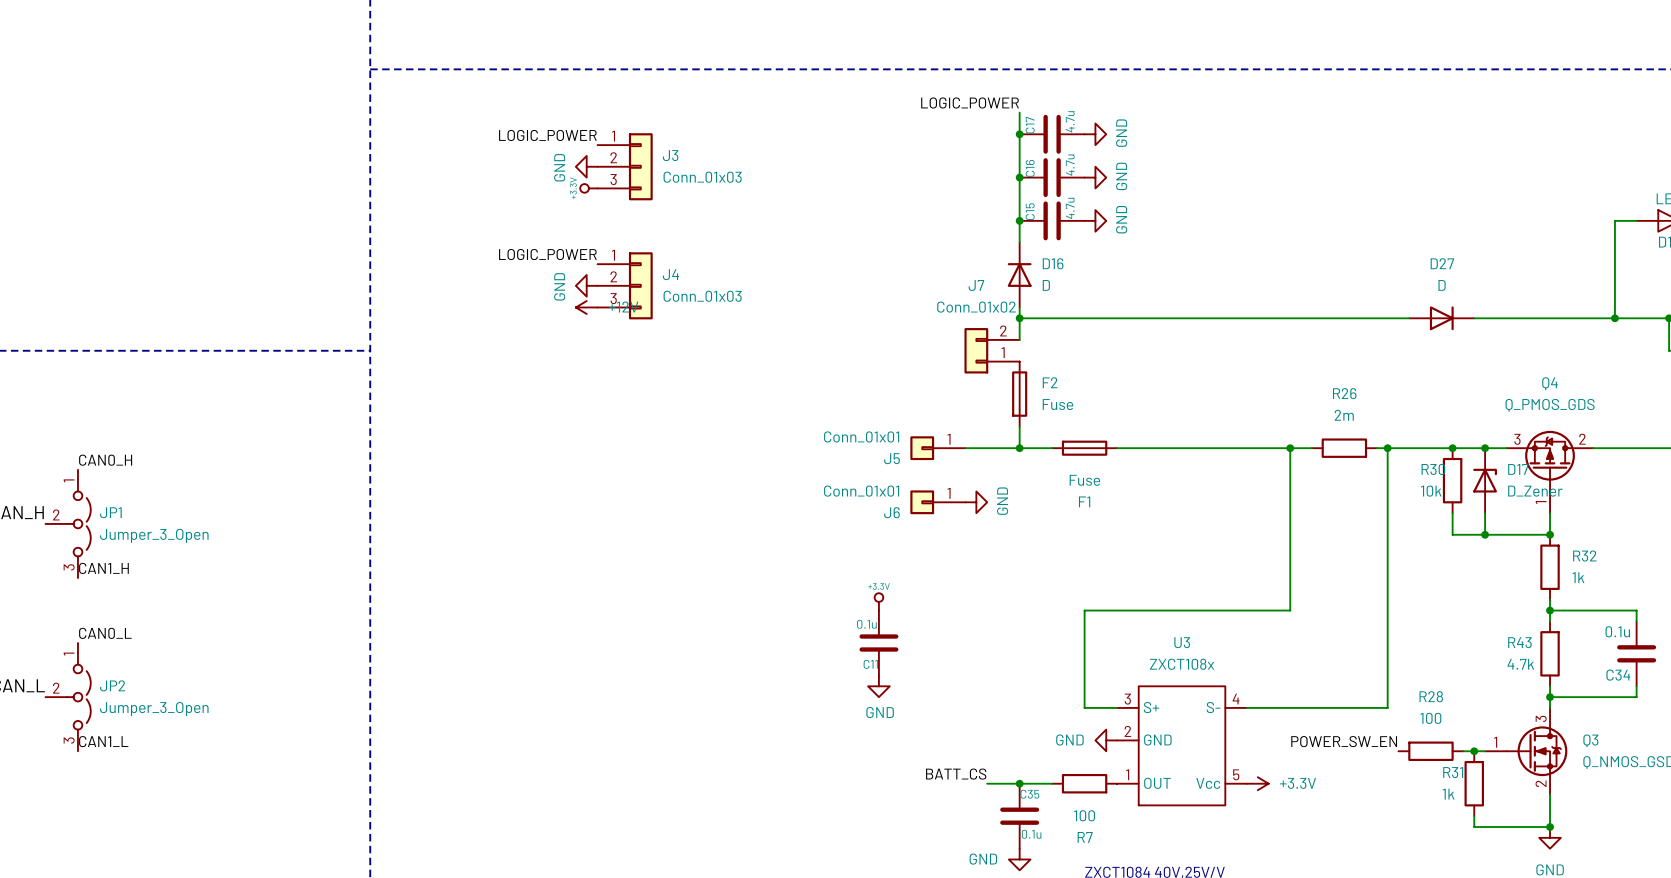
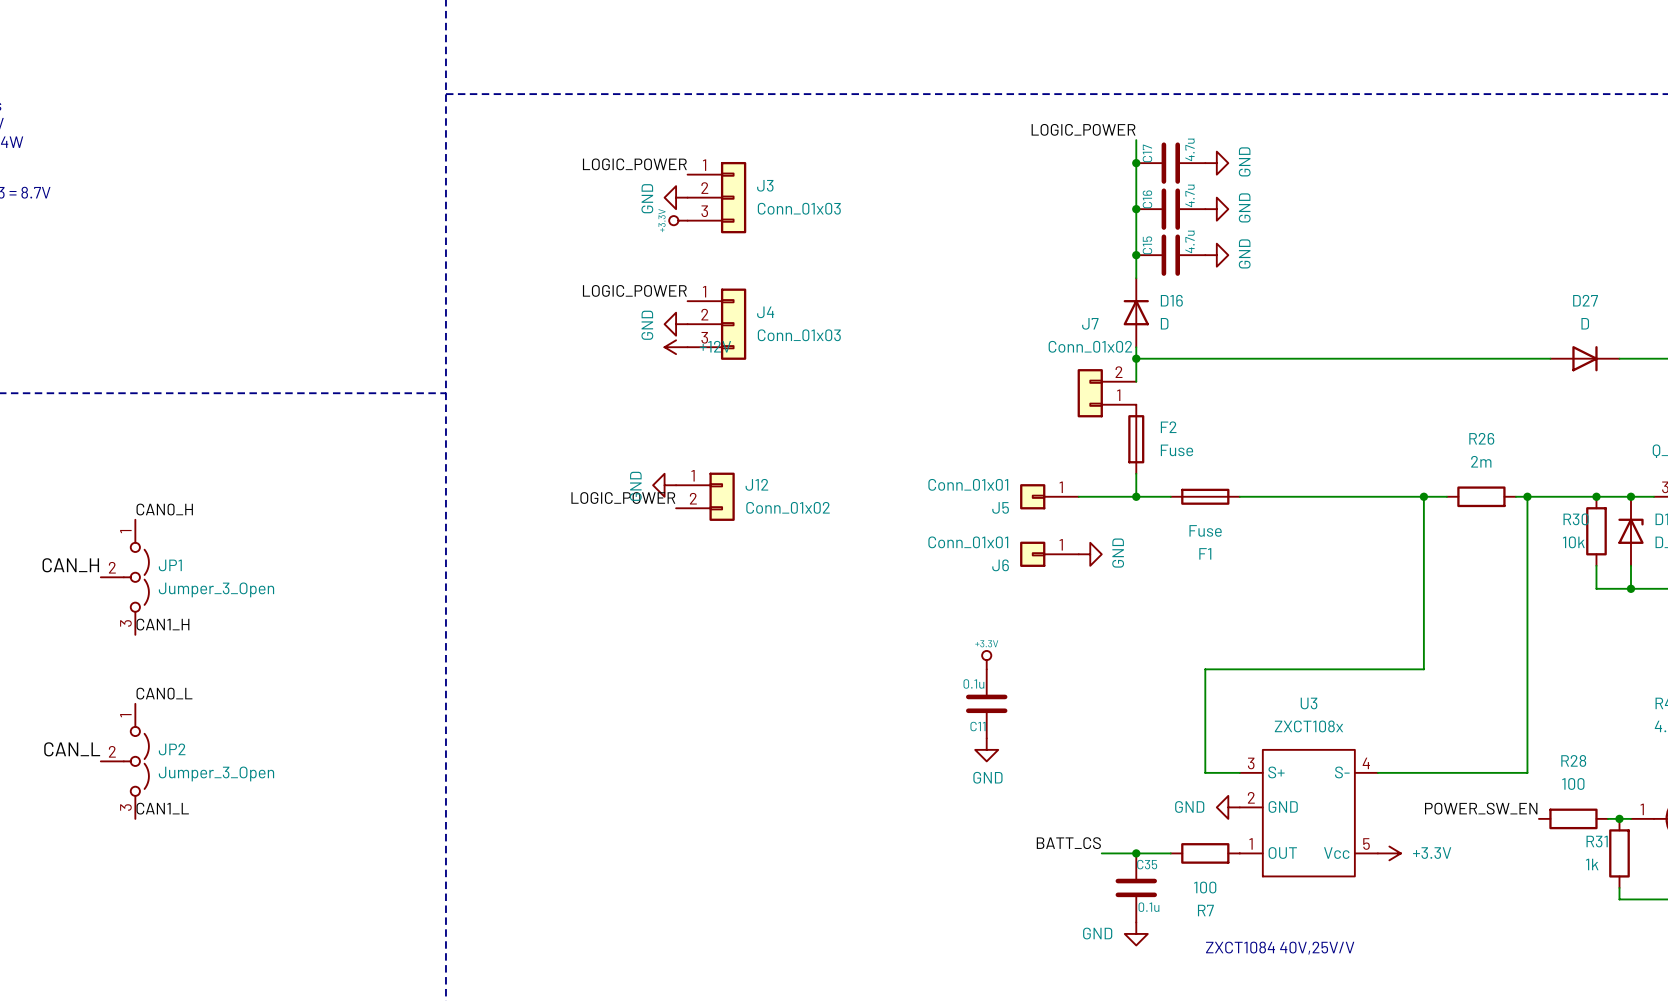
power symbol: none -> GND (664, 485)
J12: none -> Conn_01x02 (705, 496)
label: none -> LOGIC_POWER (623, 498)

